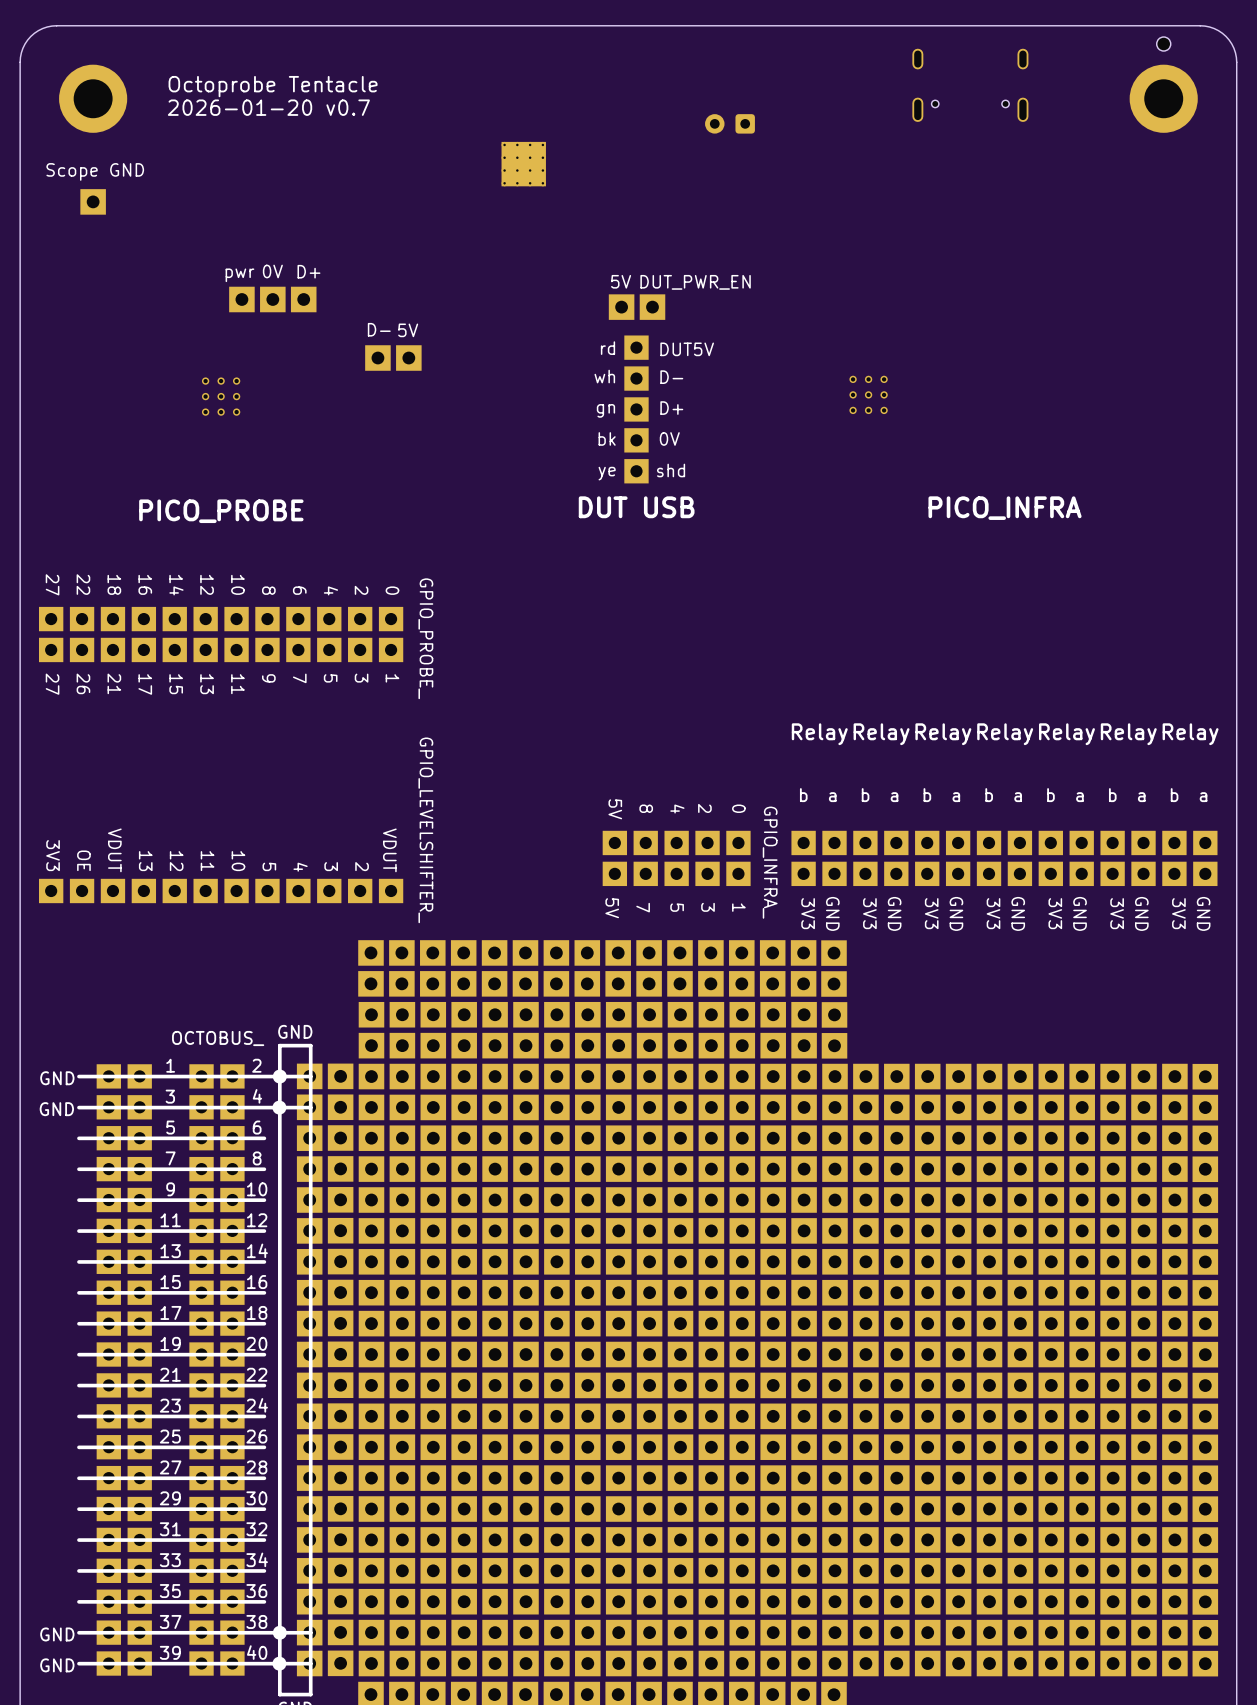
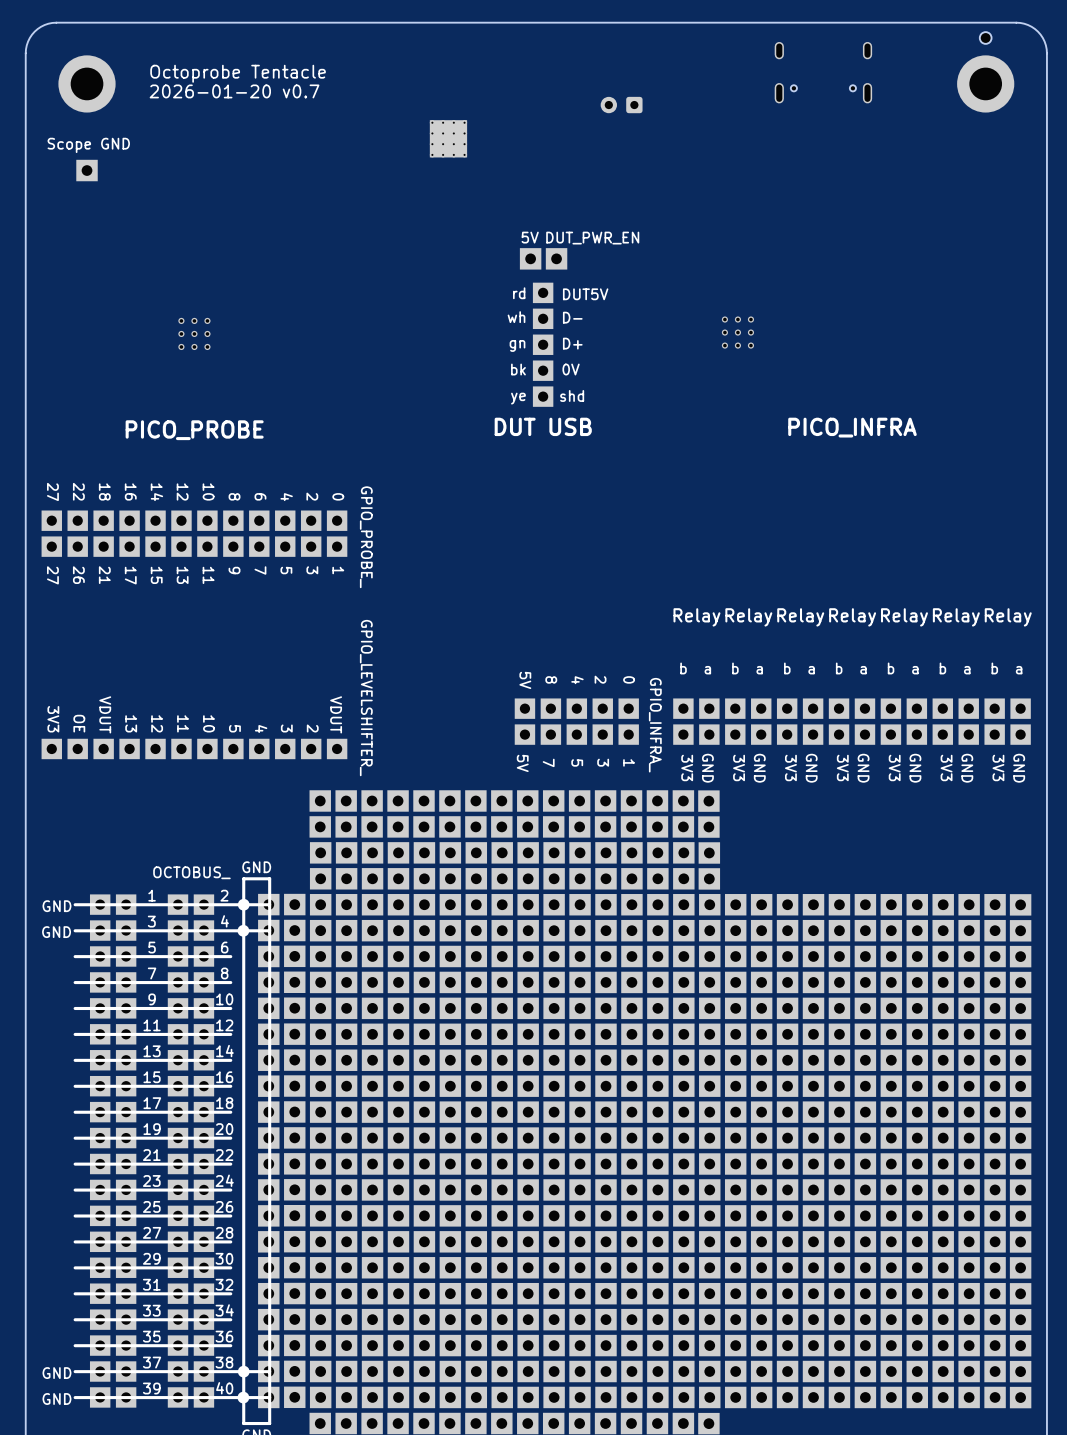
text: 0V (272, 271) -> none
text: D+ (308, 271) -> none
text: pwr (239, 275) -> none
part: (241, 299) -> none
part: (272, 299) -> none
part: (303, 299) -> none
text: D- (379, 329) -> none
text: 5V (408, 330) -> none
part: (377, 358) -> none
part: (408, 358) -> none

